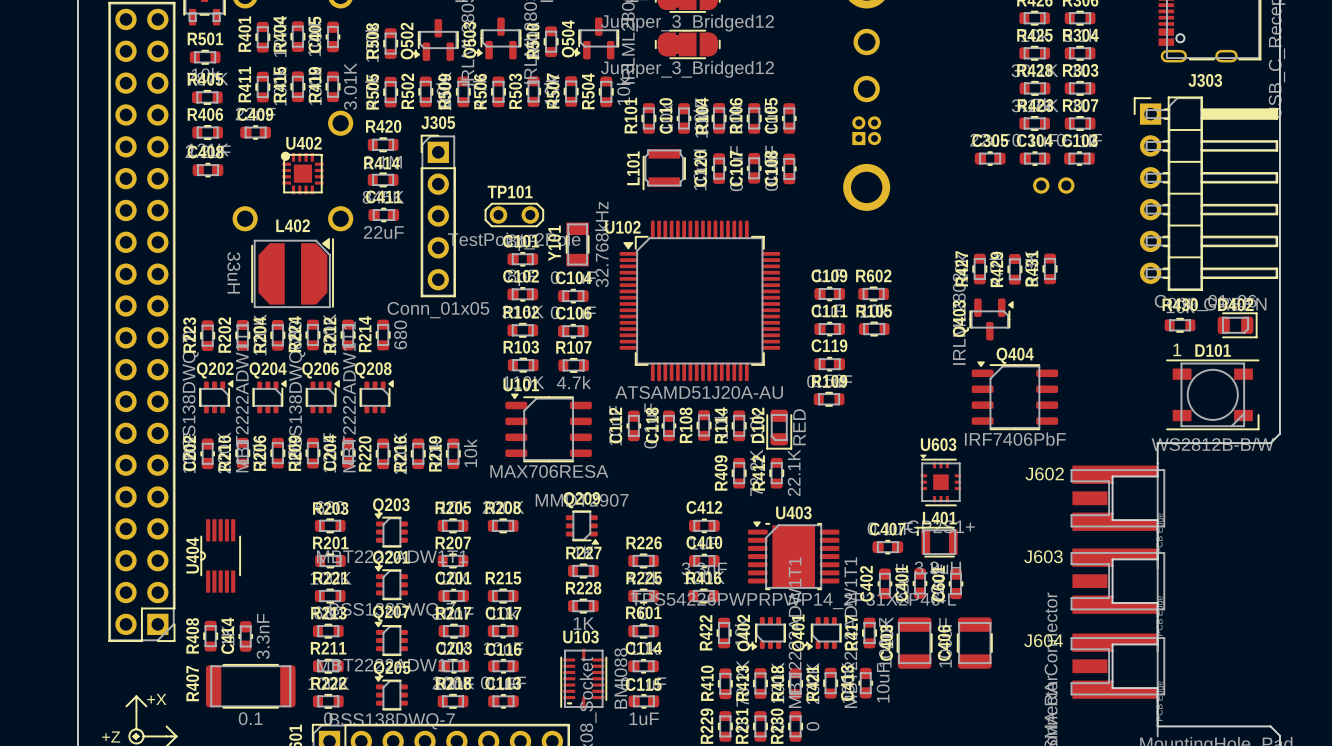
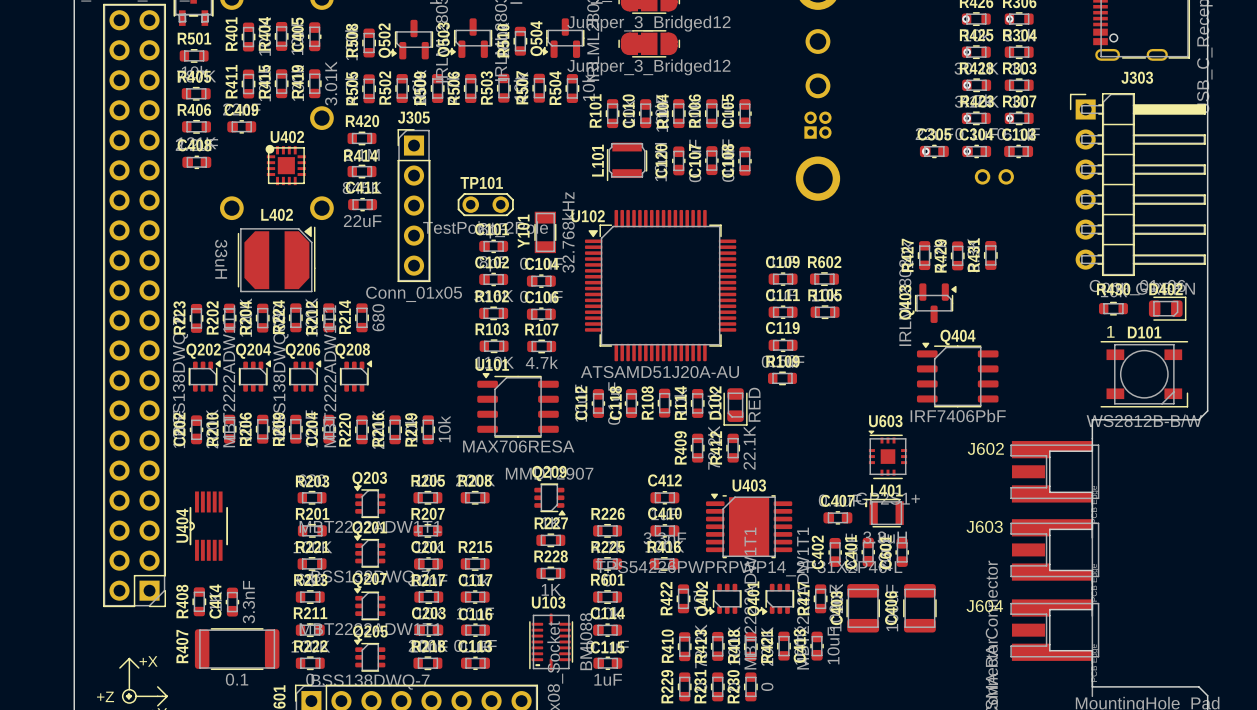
via: none -> (966, 19)
via: none -> (1009, 19)
via: none -> (967, 52)
via: none -> (967, 85)
via: none -> (967, 118)
via: none -> (1009, 118)
via: none -> (925, 151)
via: none -> (967, 151)

